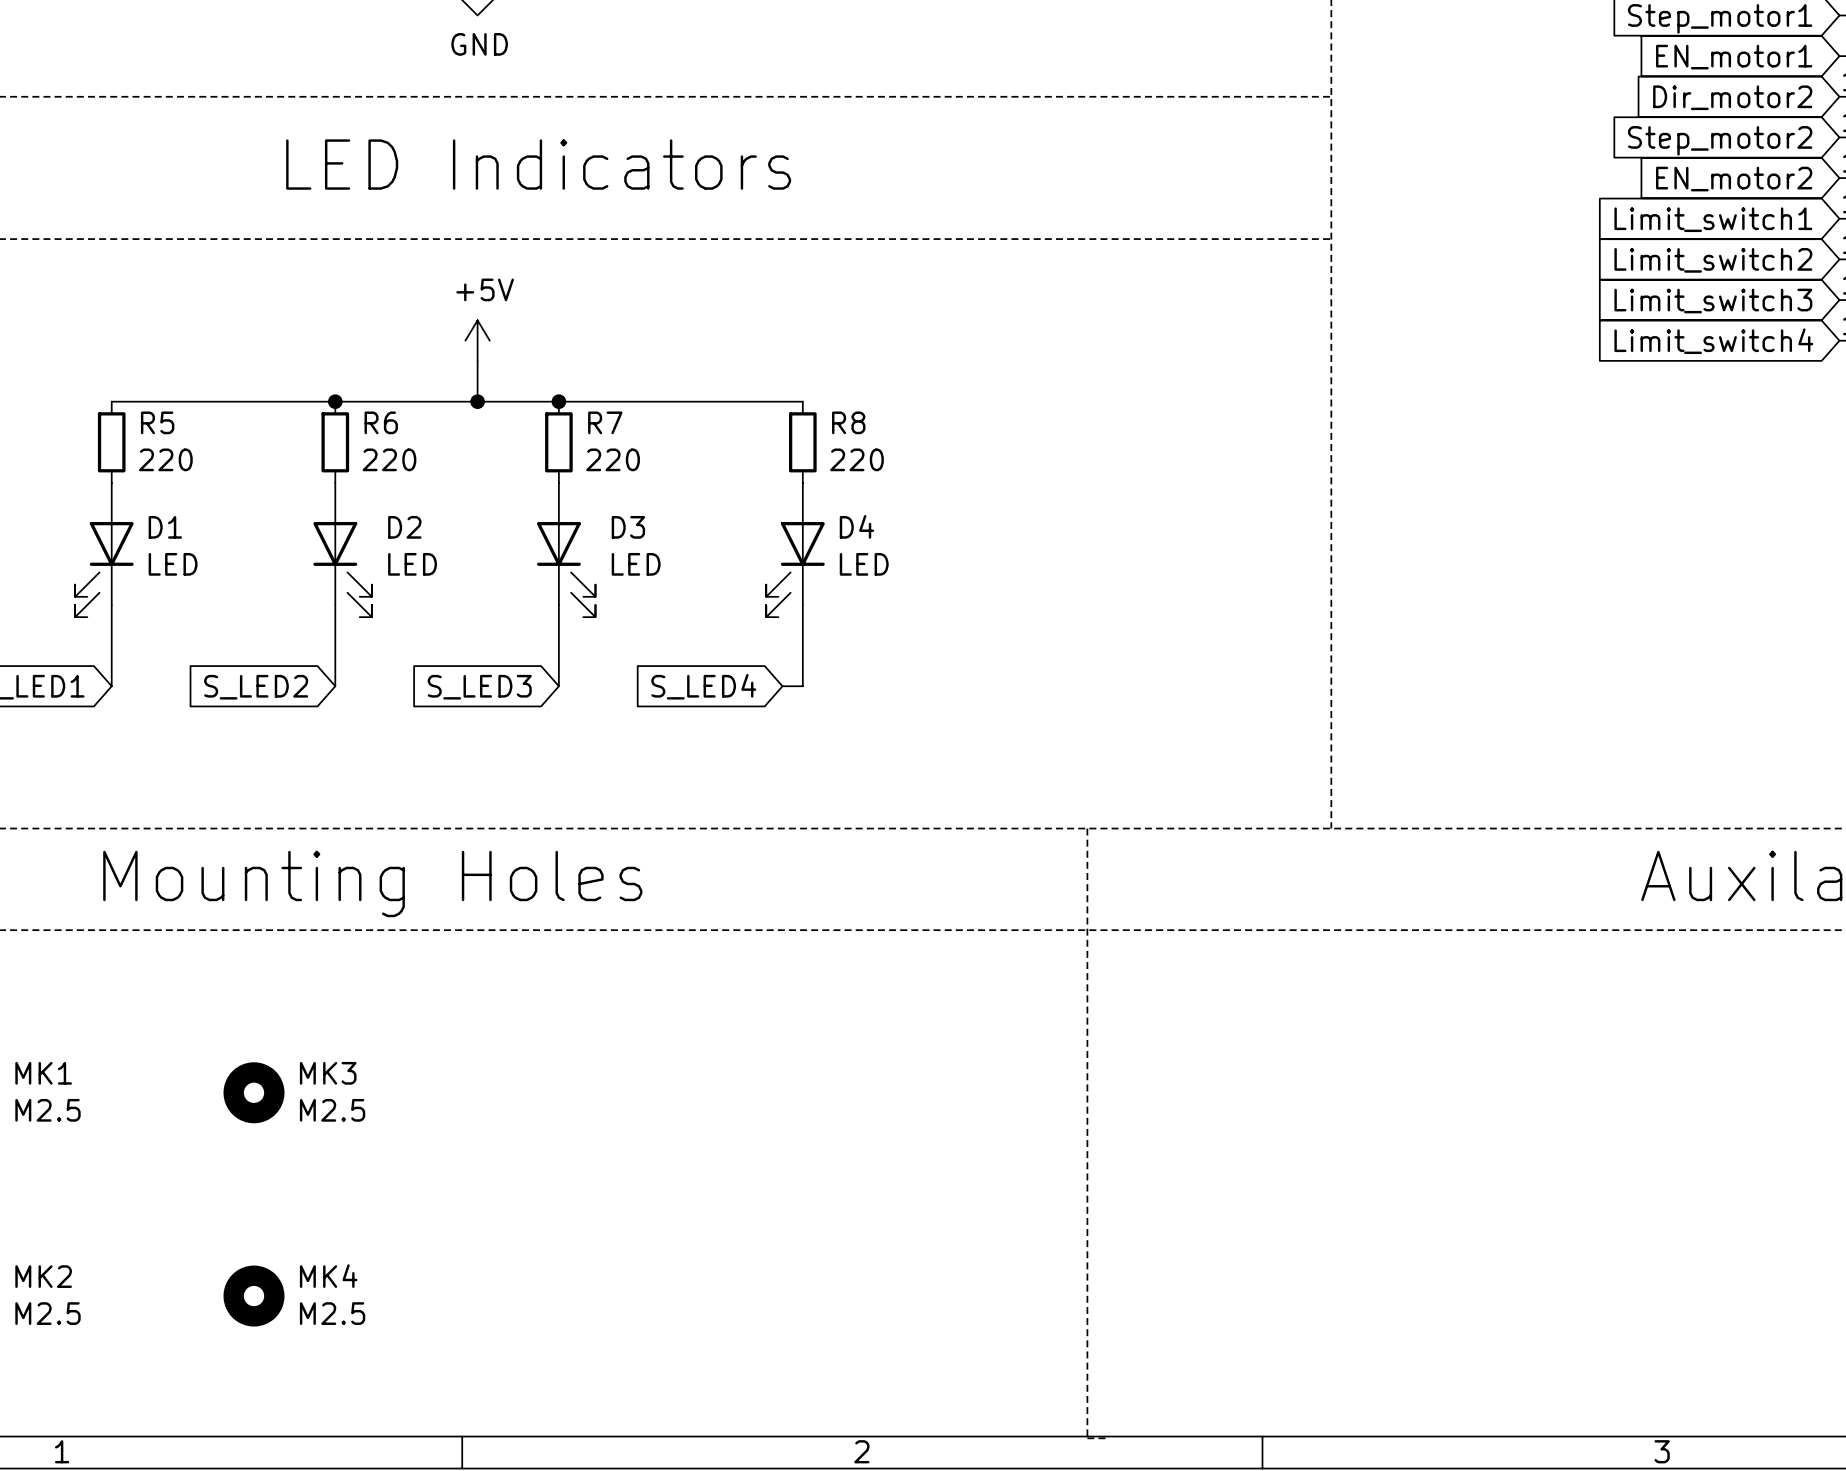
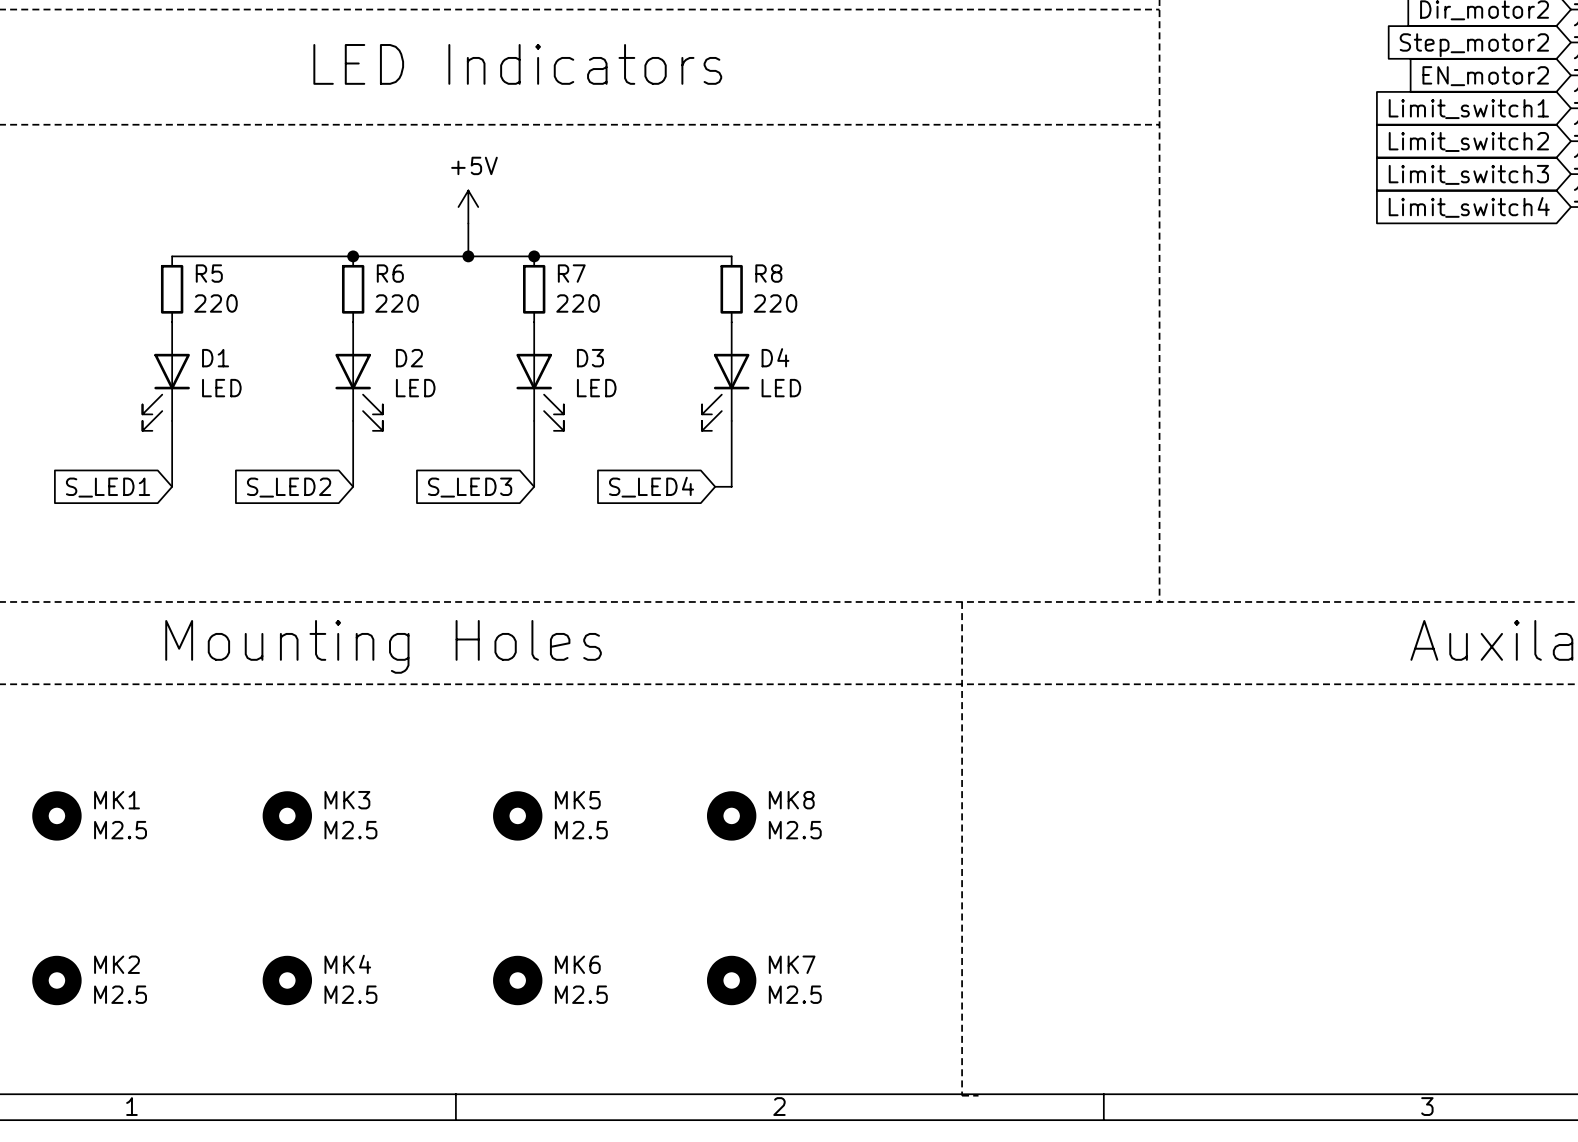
MK5: none -> M2.5 (517, 815)
MK8: none -> M2.5 (731, 815)
MK6: none -> M2.5 (517, 980)
MK7: none -> M2.5 (731, 980)

